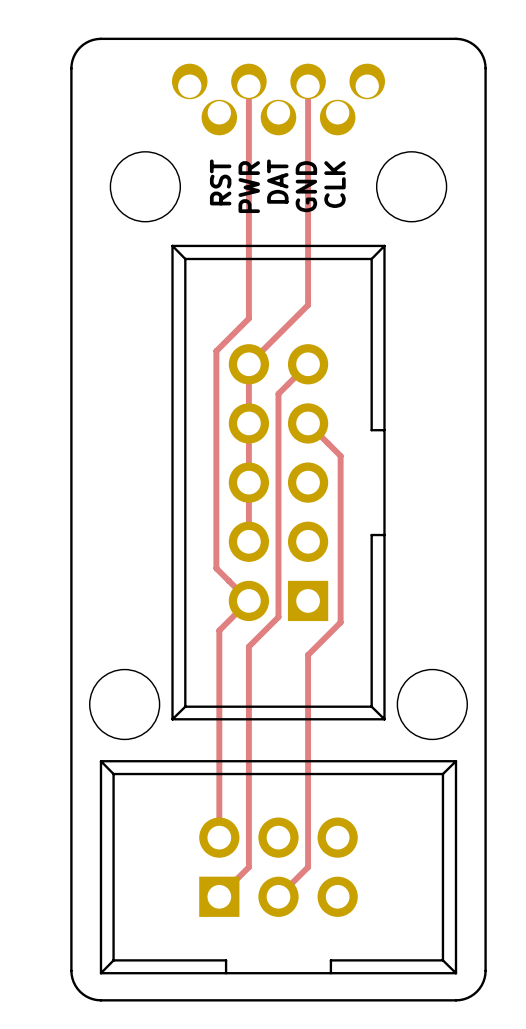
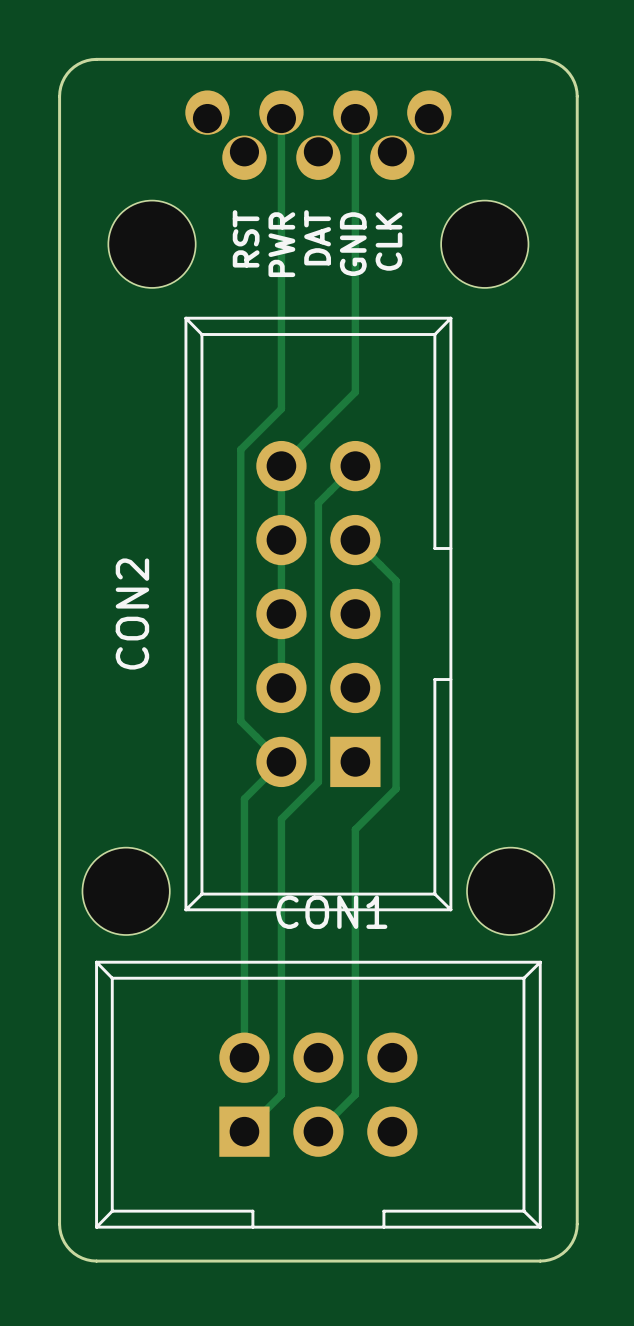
CON2 name: none -> CON2 (132, 614)
CON1 name: none -> CON1 (331, 912)

